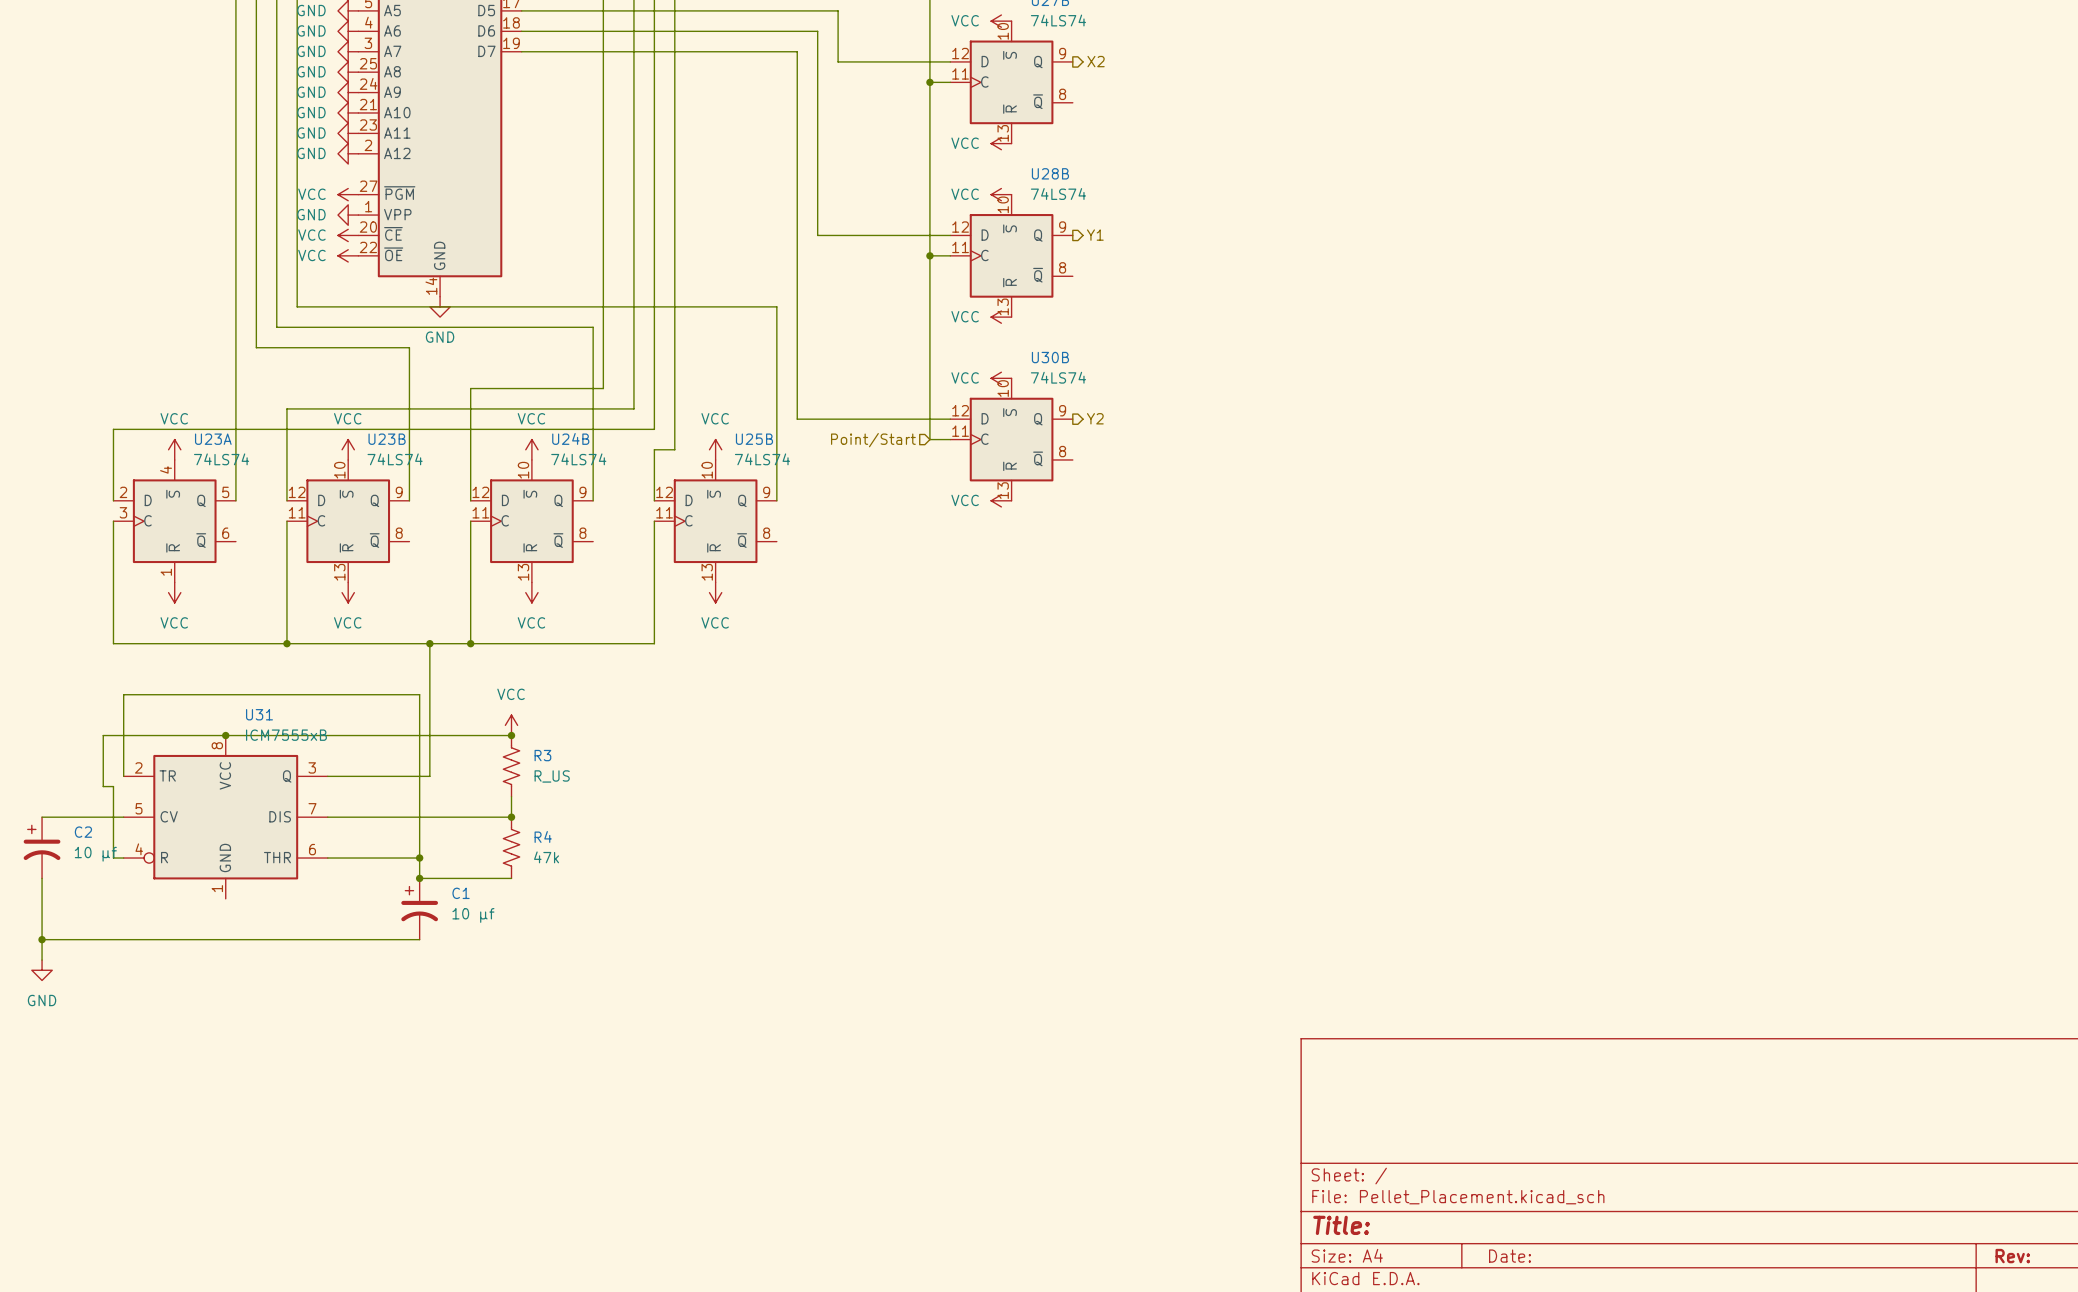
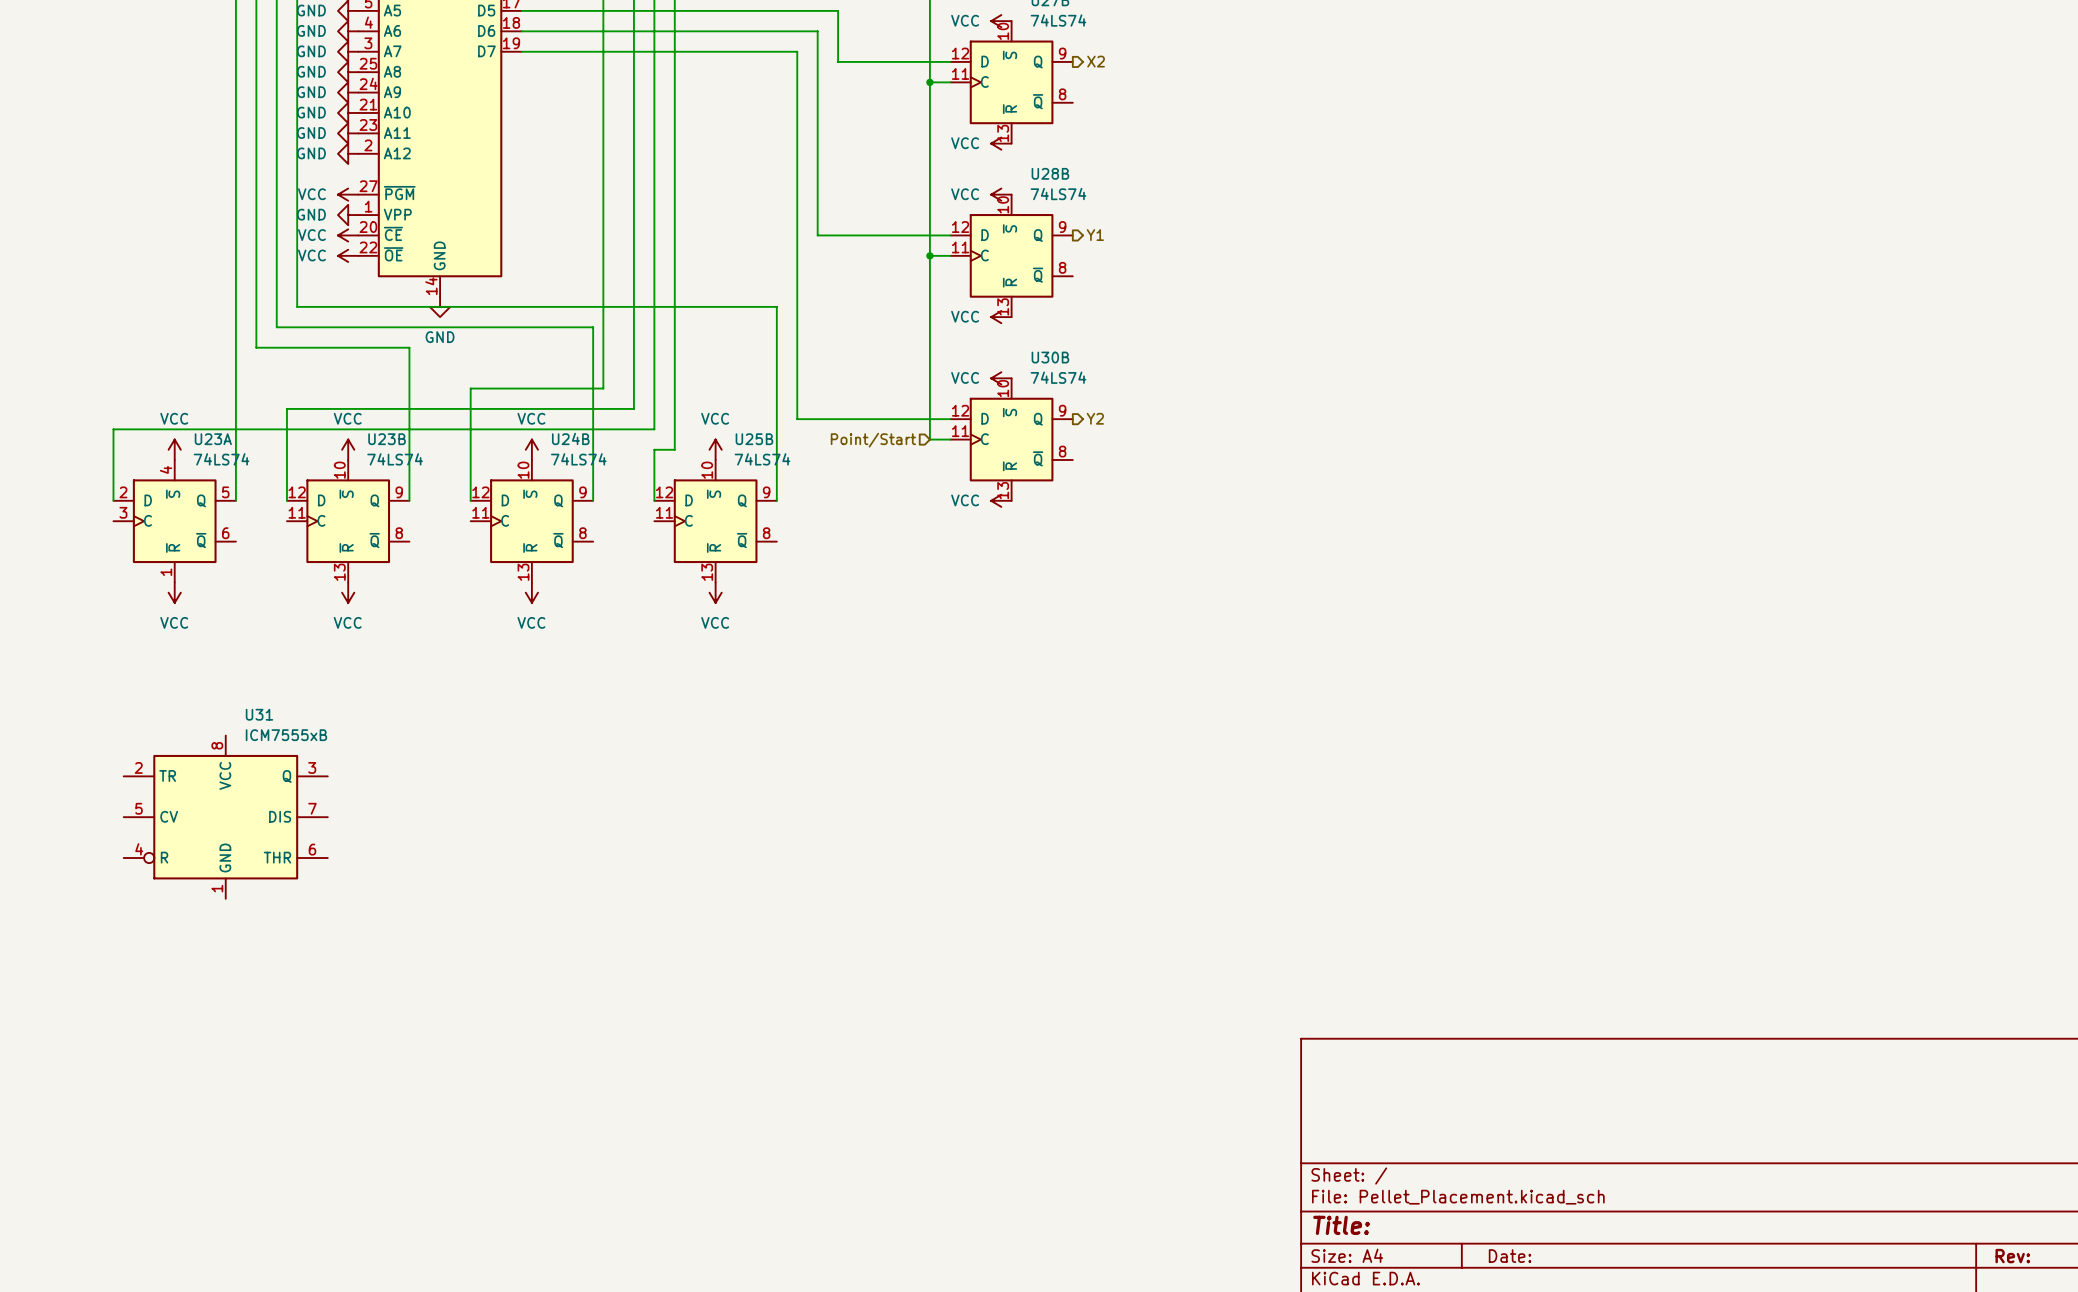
wire: (113, 521) (113, 643) (654, 643) (654, 521) -> none
wire: (286, 521) (286, 643) -> none
wire: (470, 521) (470, 643) -> none
junction: (286, 643) -> none
wire: (429, 643) (429, 776) (327, 776) -> none
junction: (429, 643) -> none
junction: (470, 643) -> none
power symbol: VCC (511, 725) -> none
junction: (225, 735) -> none
wire: (511, 735) (103, 735) (103, 786) (113, 786) (113, 858) (123, 858) -> none
junction: (511, 735) -> none
R3: R_US (511, 766) -> none
wire: (123, 776) (123, 694) (419, 694) (419, 878) (511, 878) -> none
wire: (511, 796) (511, 817) (327, 817) -> none
wire: (42, 817) (123, 817) -> none
junction: (511, 817) -> none
C2: 10 μf (42, 847) -> none
R4: 47k (511, 847) -> none
wire: (327, 858) (419, 858) -> none
junction: (419, 858) -> none
wire: (42, 878) (42, 960) -> none
junction: (419, 878) -> none
C1: 10 μf (419, 909) -> none
wire: (42, 939) (419, 939) -> none
junction: (42, 939) -> none
power symbol: GND (42, 970) -> none

